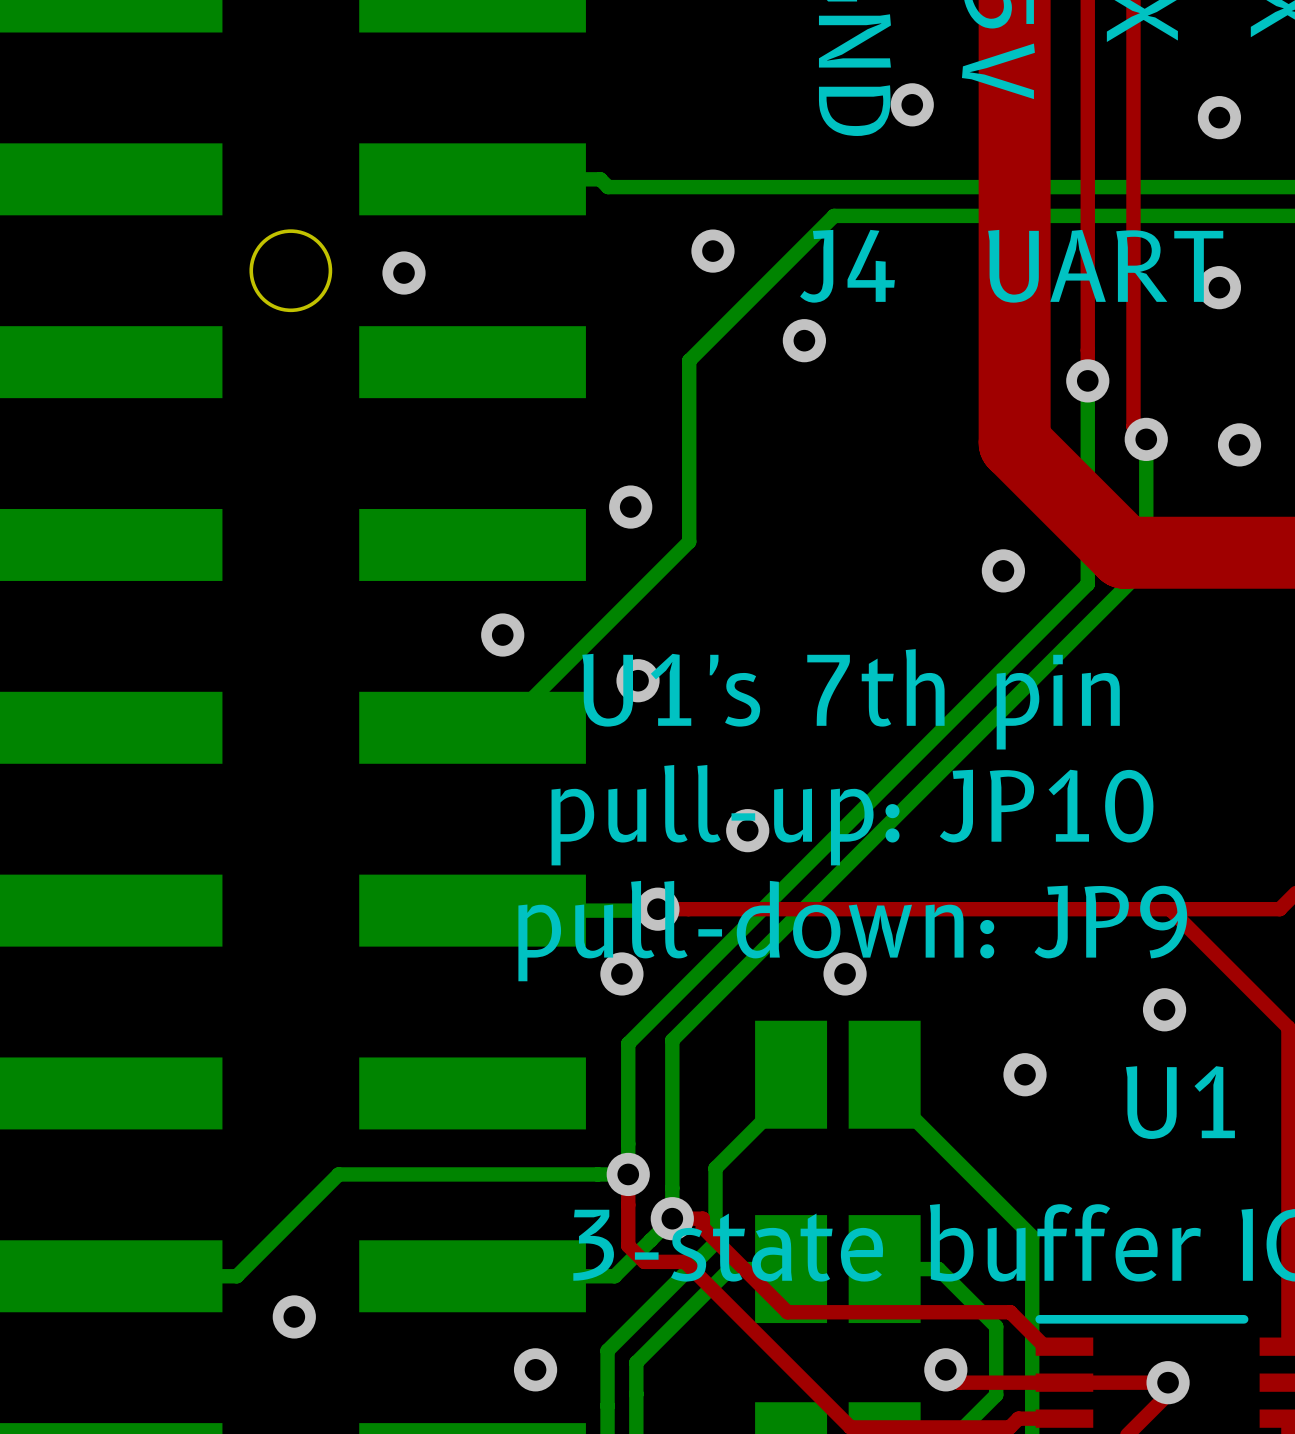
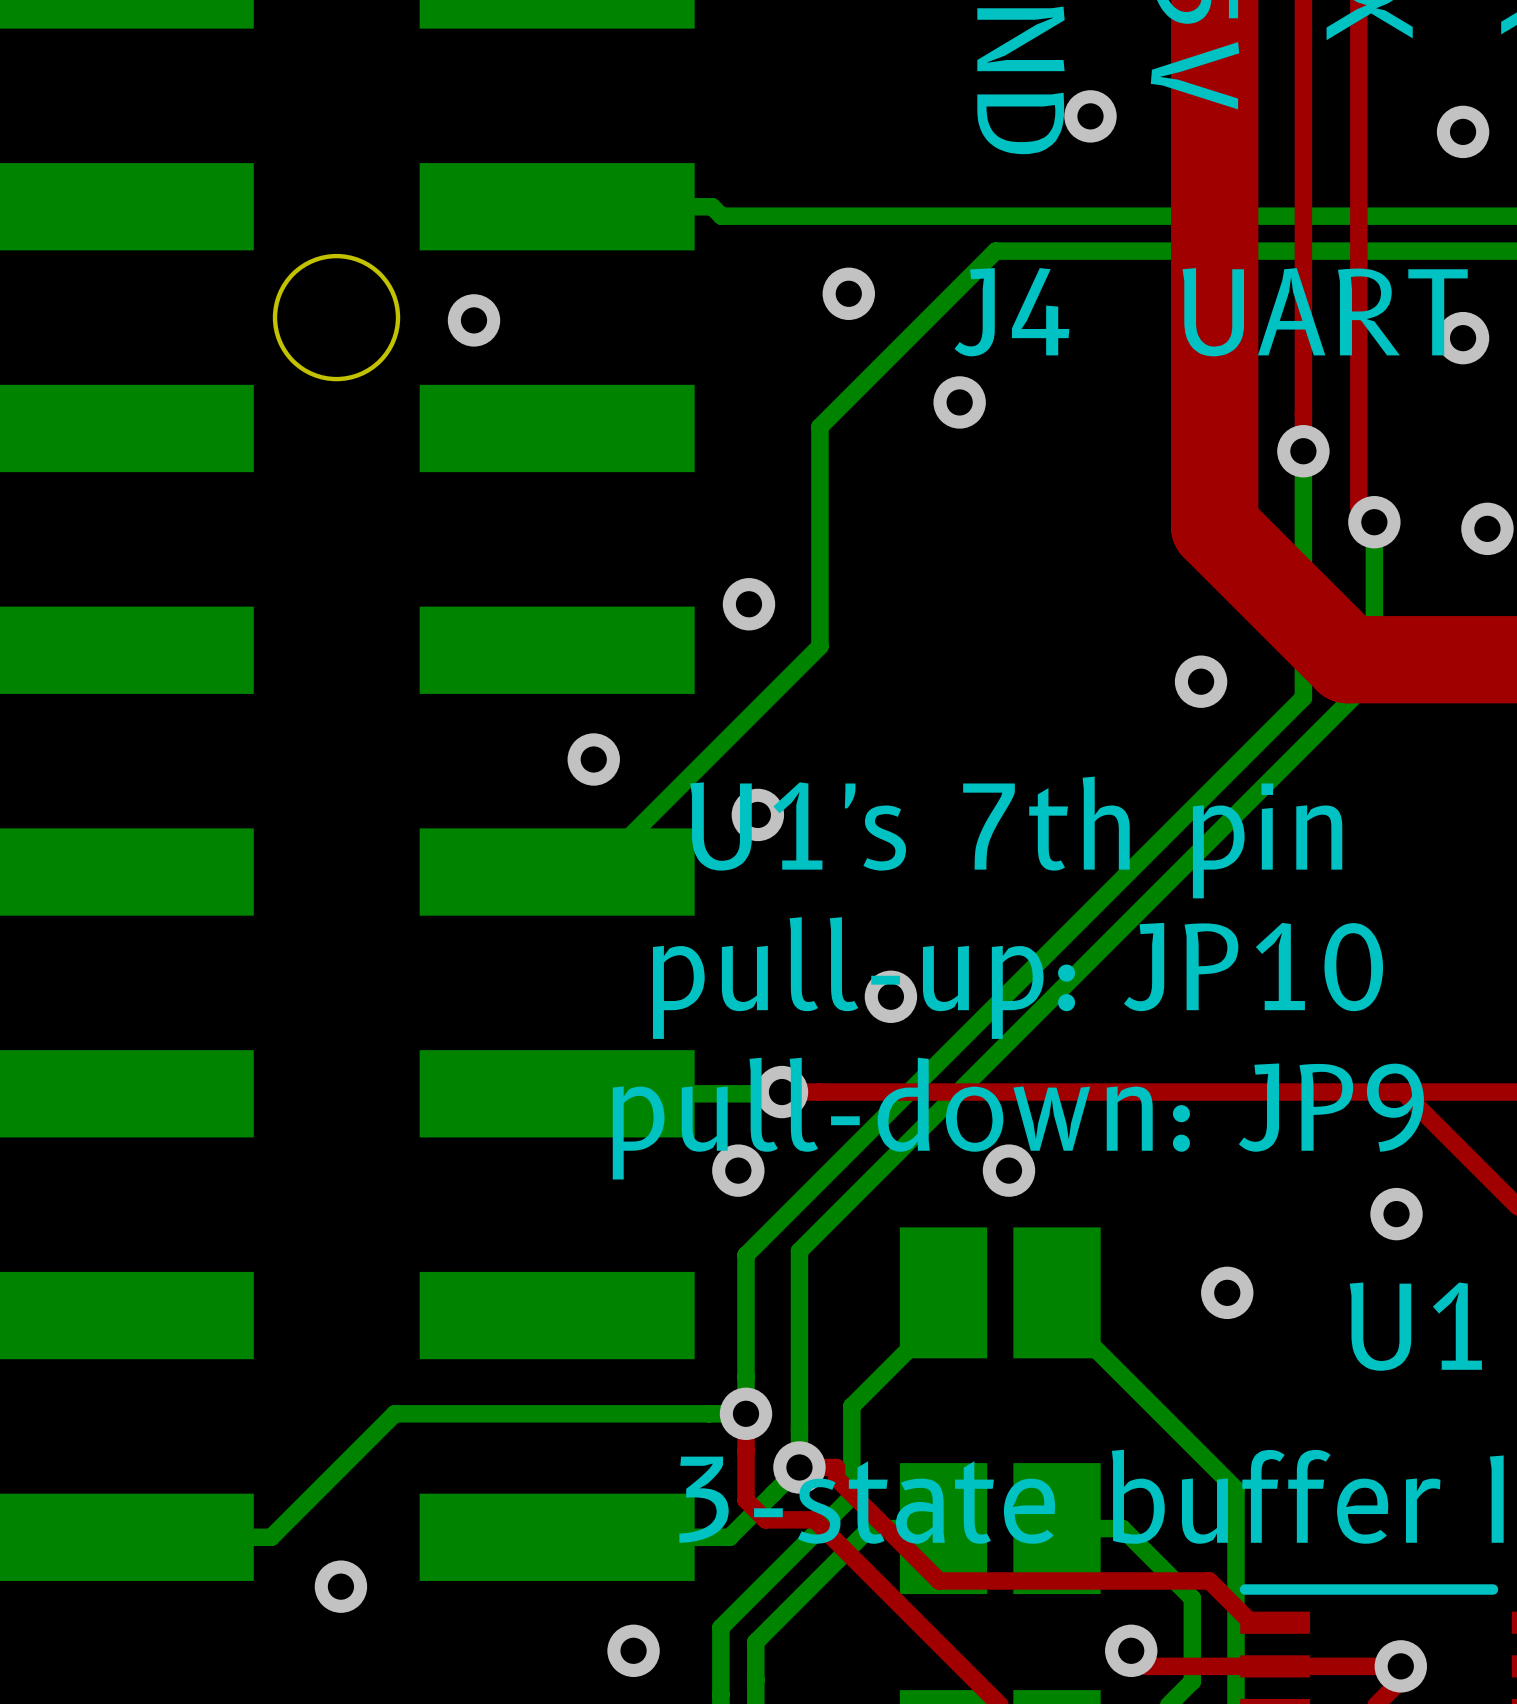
round board edge size: [249, 229, 333, 313] -> [272, 253, 401, 382]

